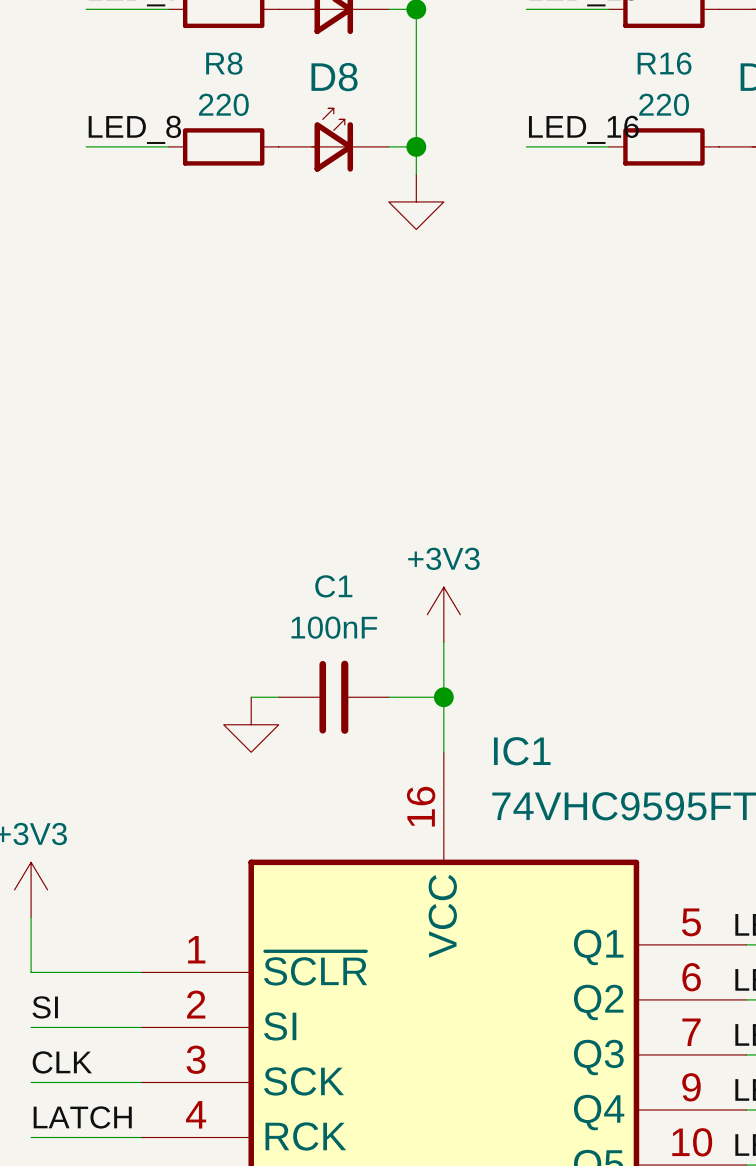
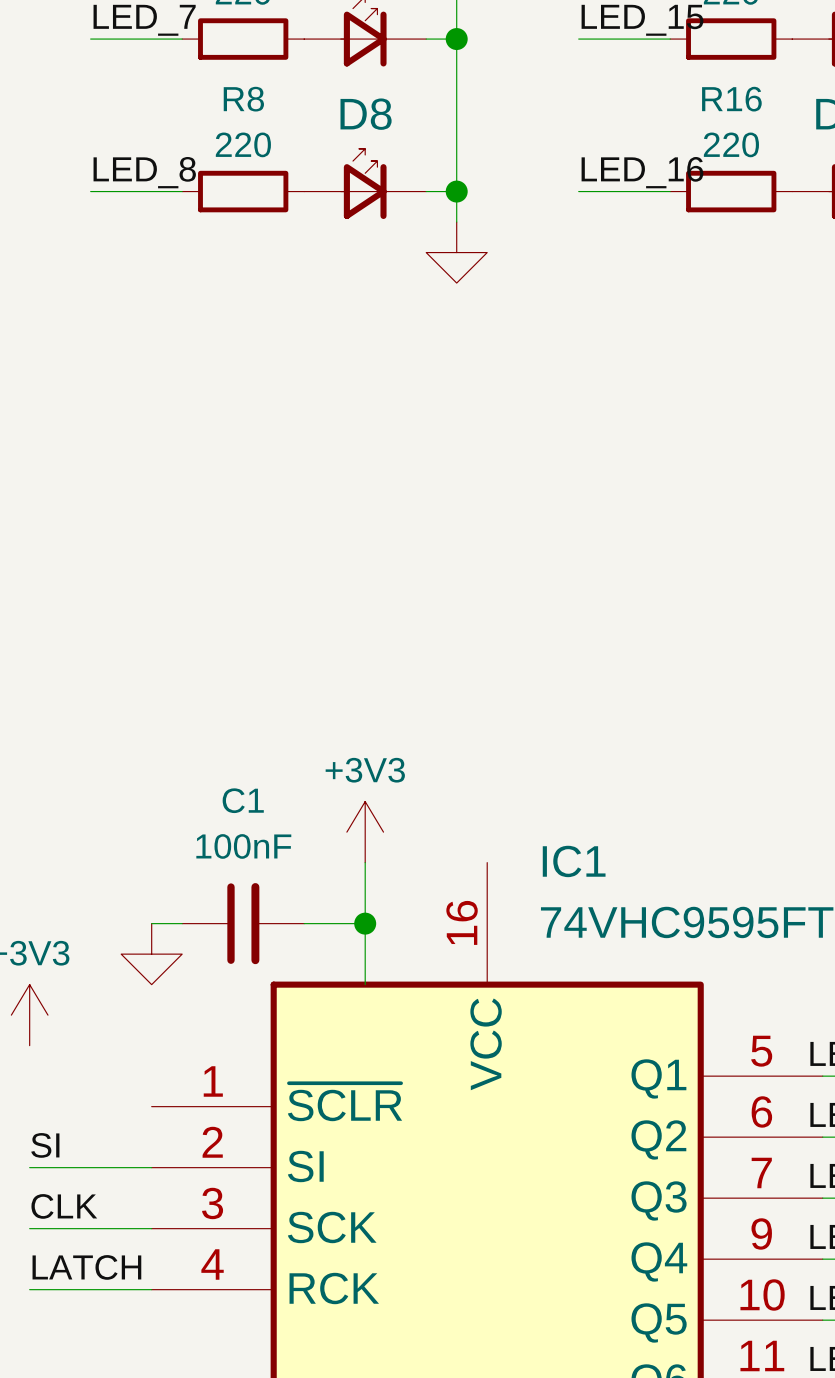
power symbol position: +3V3 (443, 614) -> +3V3 (365, 832)
wire: (443, 642) (443, 752) -> (365, 862) (365, 984)
wire: (251, 697) (278, 697) -> (151, 923) (182, 923)
C1 position: (333, 697) -> (243, 923)
wire: (388, 697) (443, 697) -> (304, 923) (365, 923)
junction: (443, 697) -> none
power symbol position: (251, 724) -> (151, 954)
junction: none -> (365, 923)
wire: (31, 917) (31, 972) (141, 972) -> none

